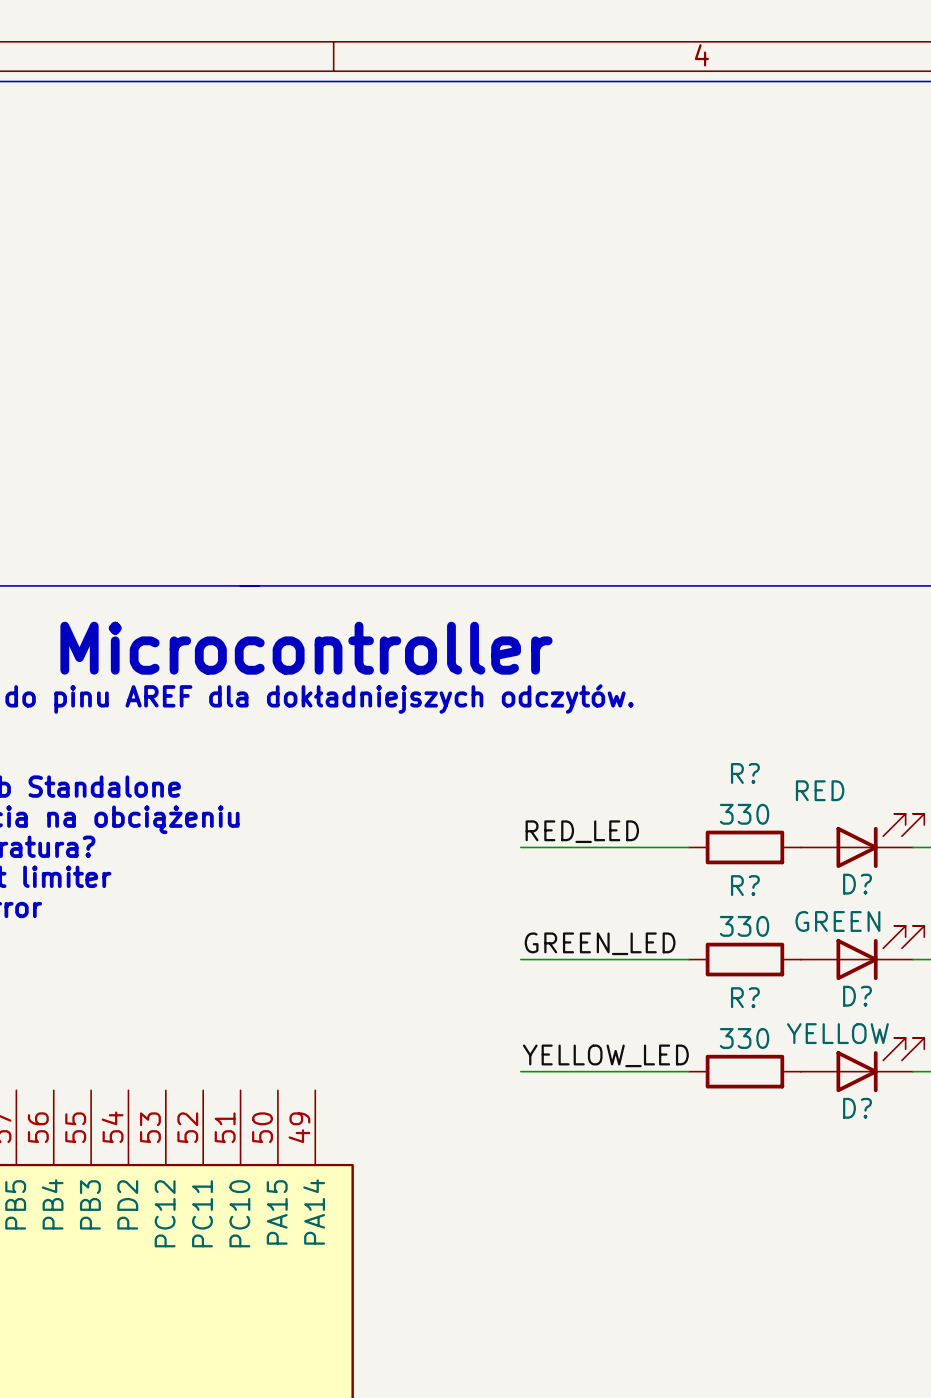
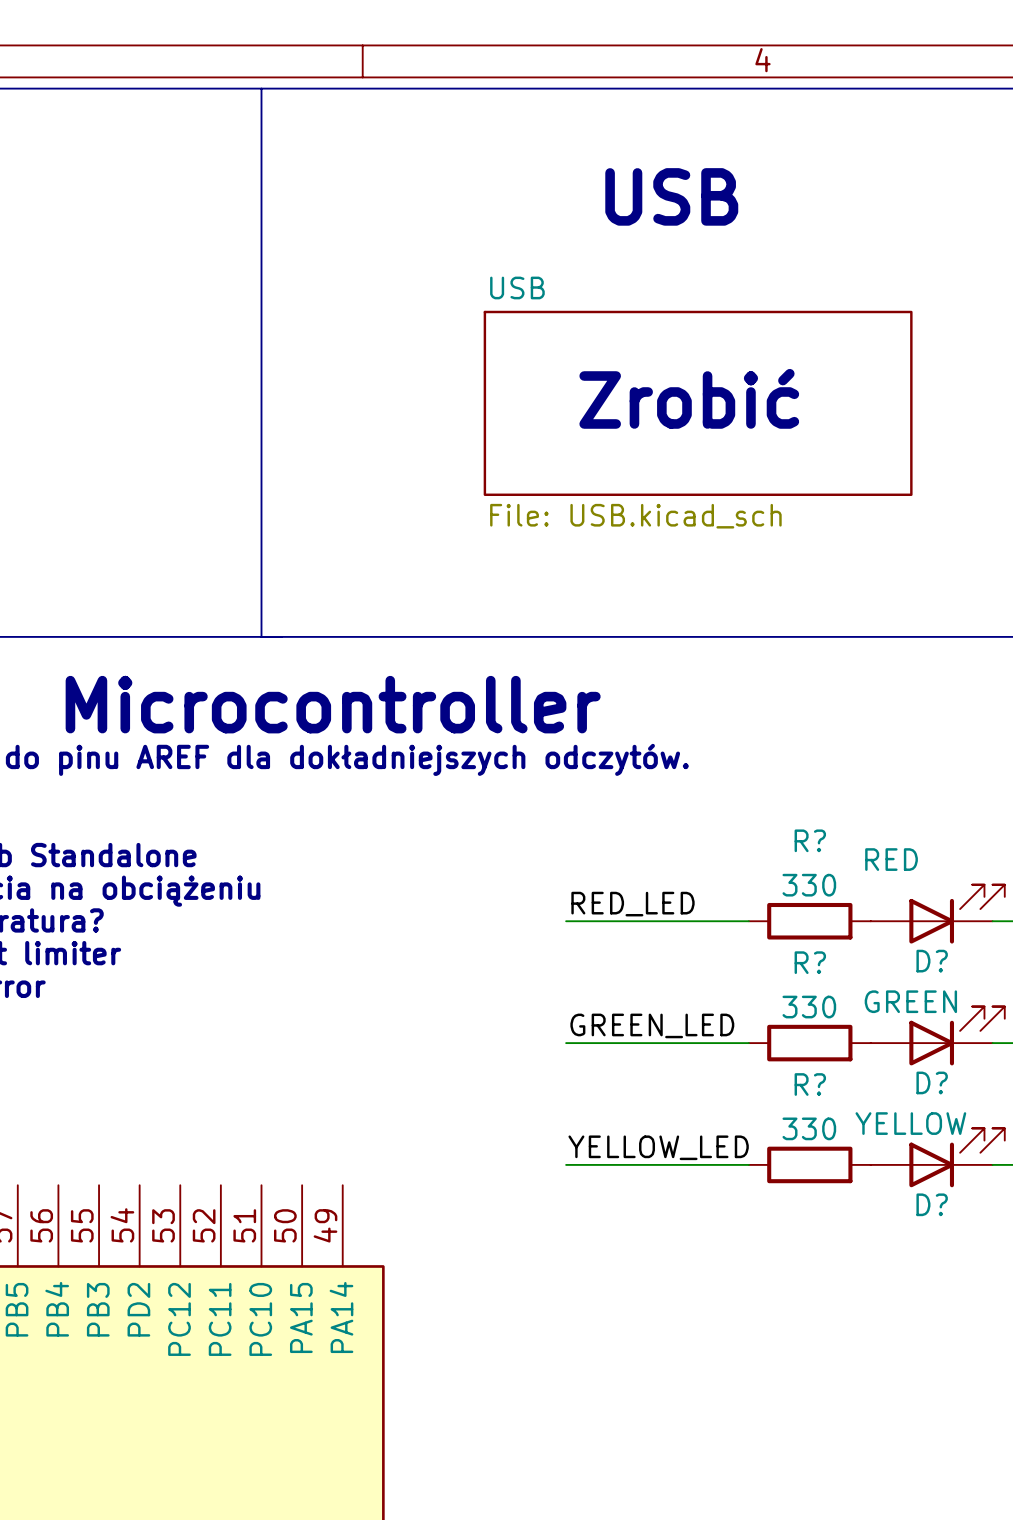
line: none -> (261, 88) (261, 636)
text: none -> USB (671, 196)
text: none -> Zrobić (689, 398)
sheet USB: none -> File: USB.kicad_sch (698, 403)

